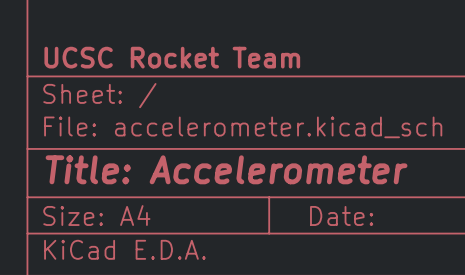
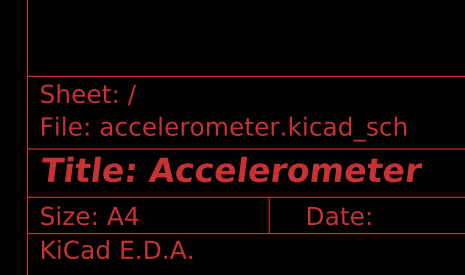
title block: UCSC Rocket Team (172, 57) -> none

